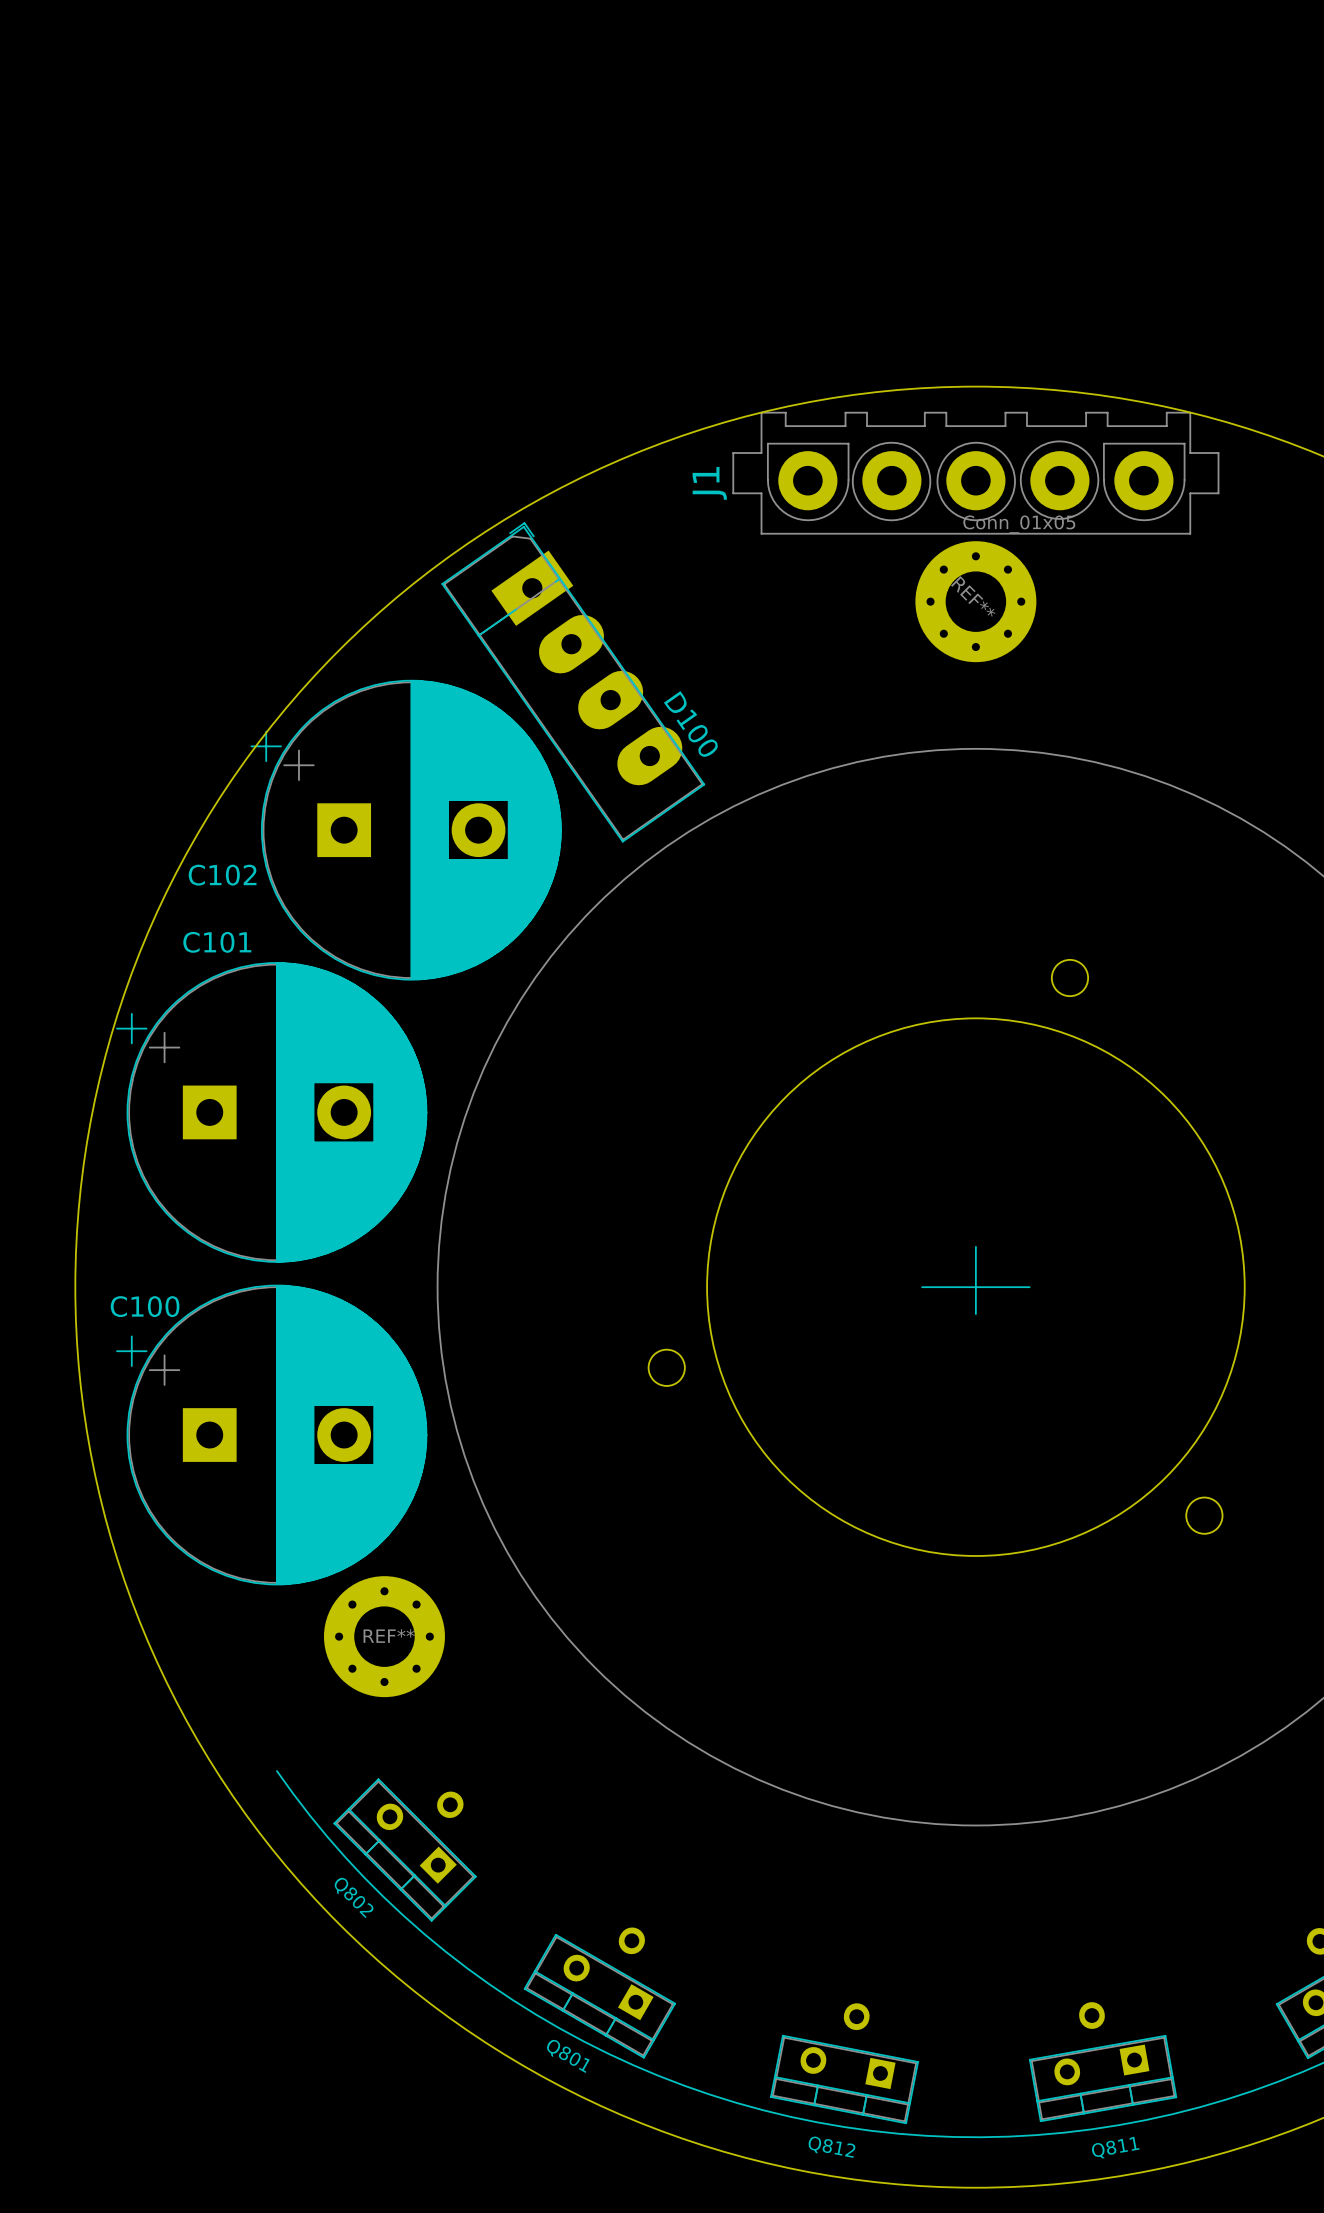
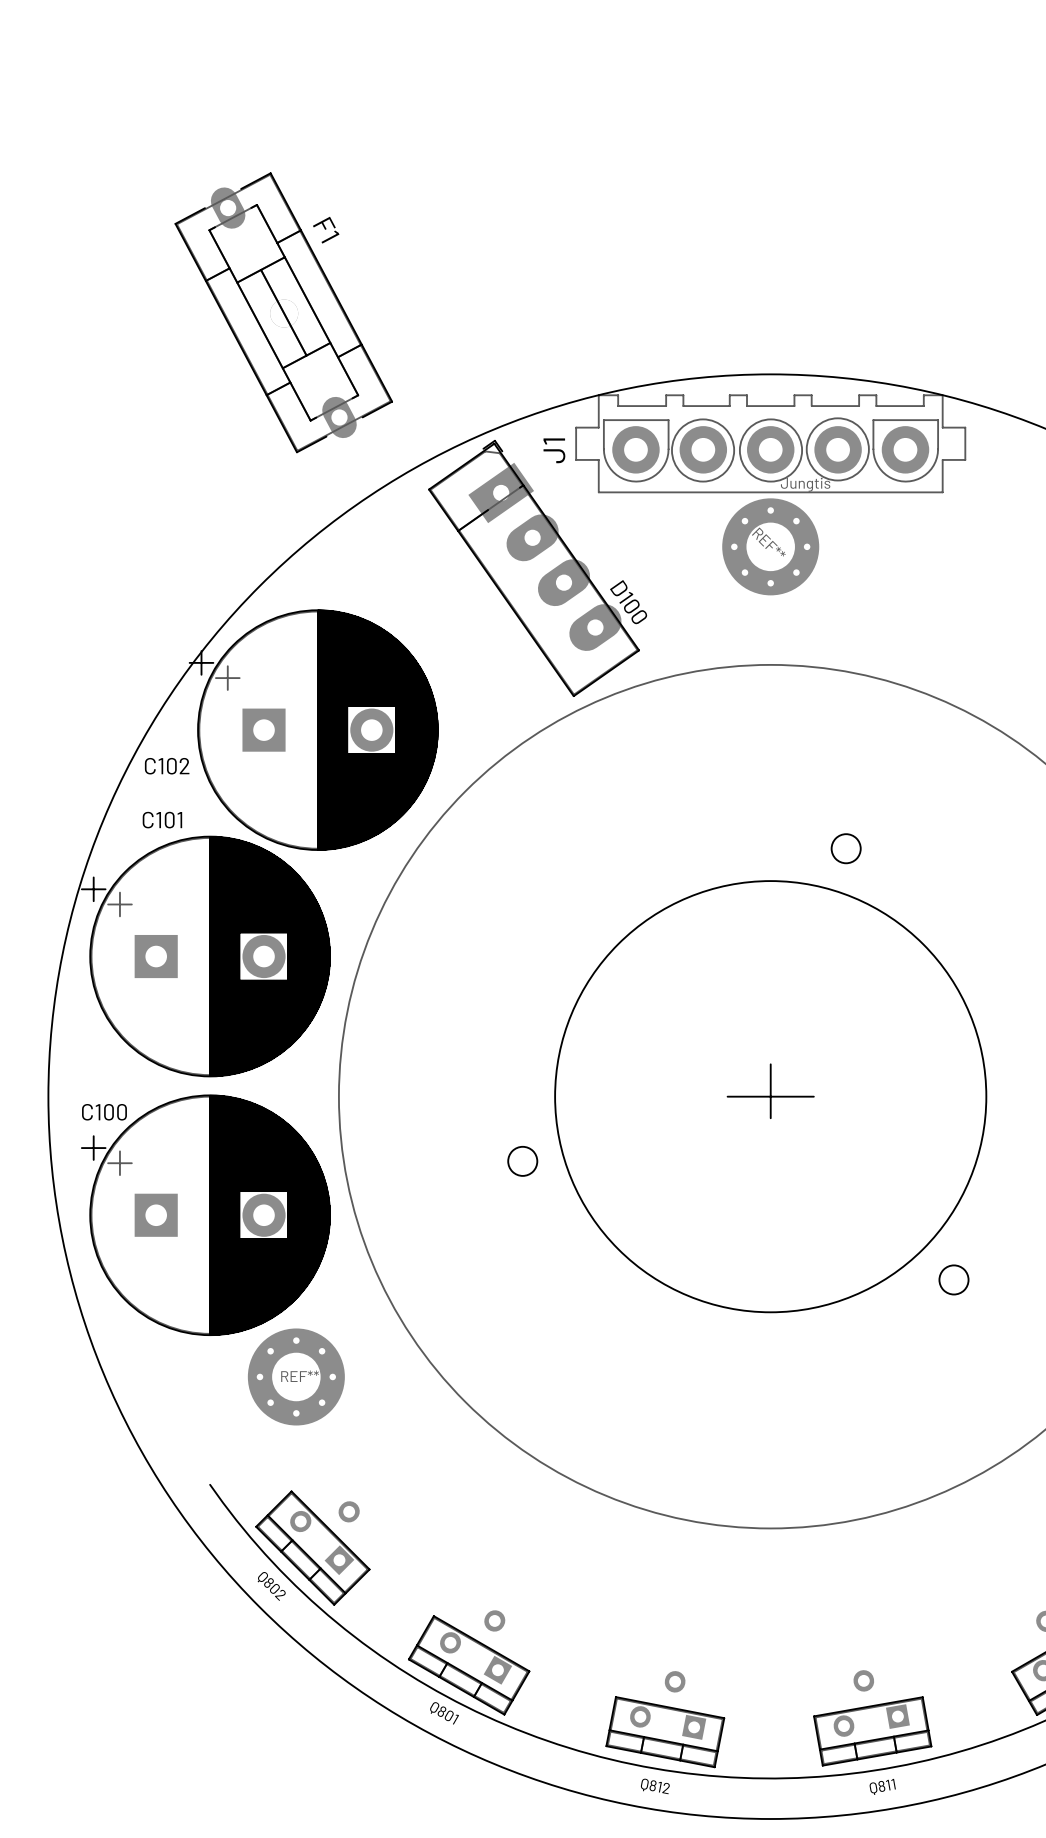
F1: none -> (283, 312)
J1 value: Conn_01x05 (1019, 524) -> Jungtis (805, 484)
D100 position: (573, 682) -> (534, 568)

